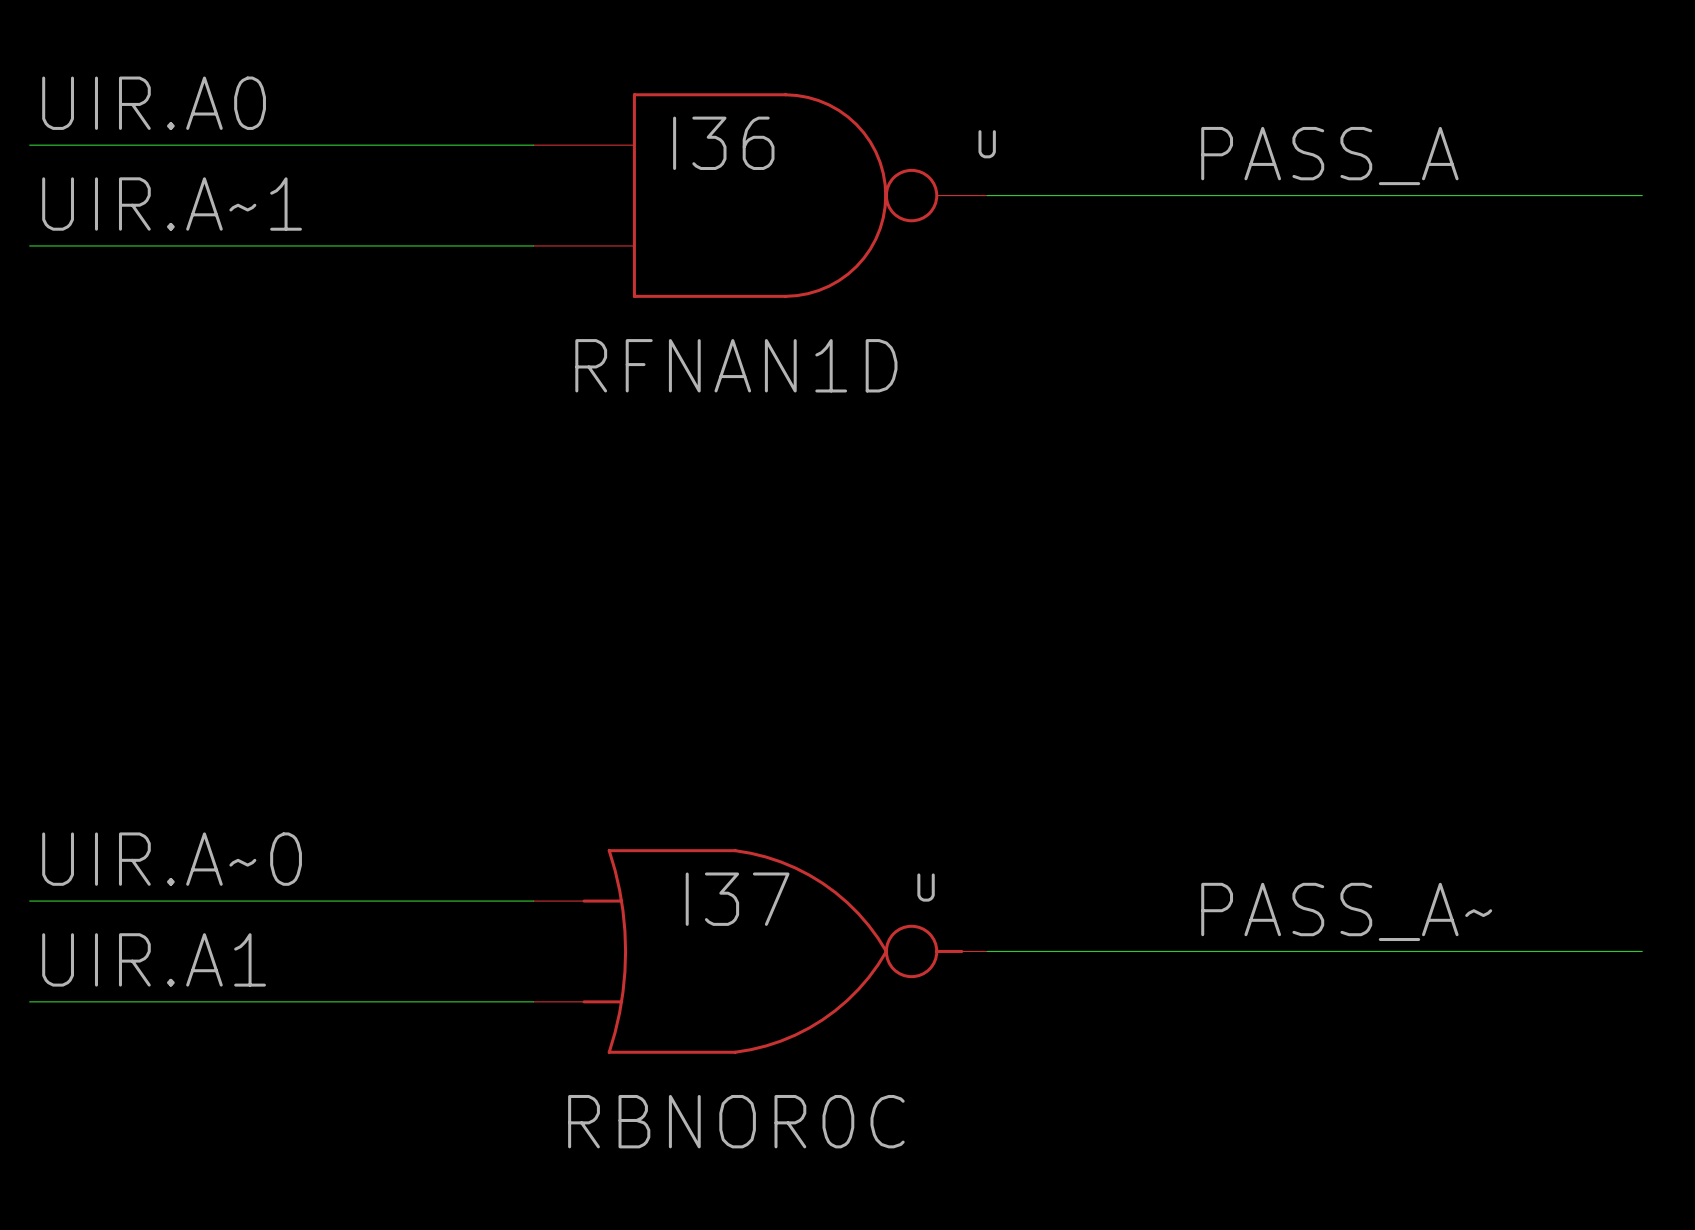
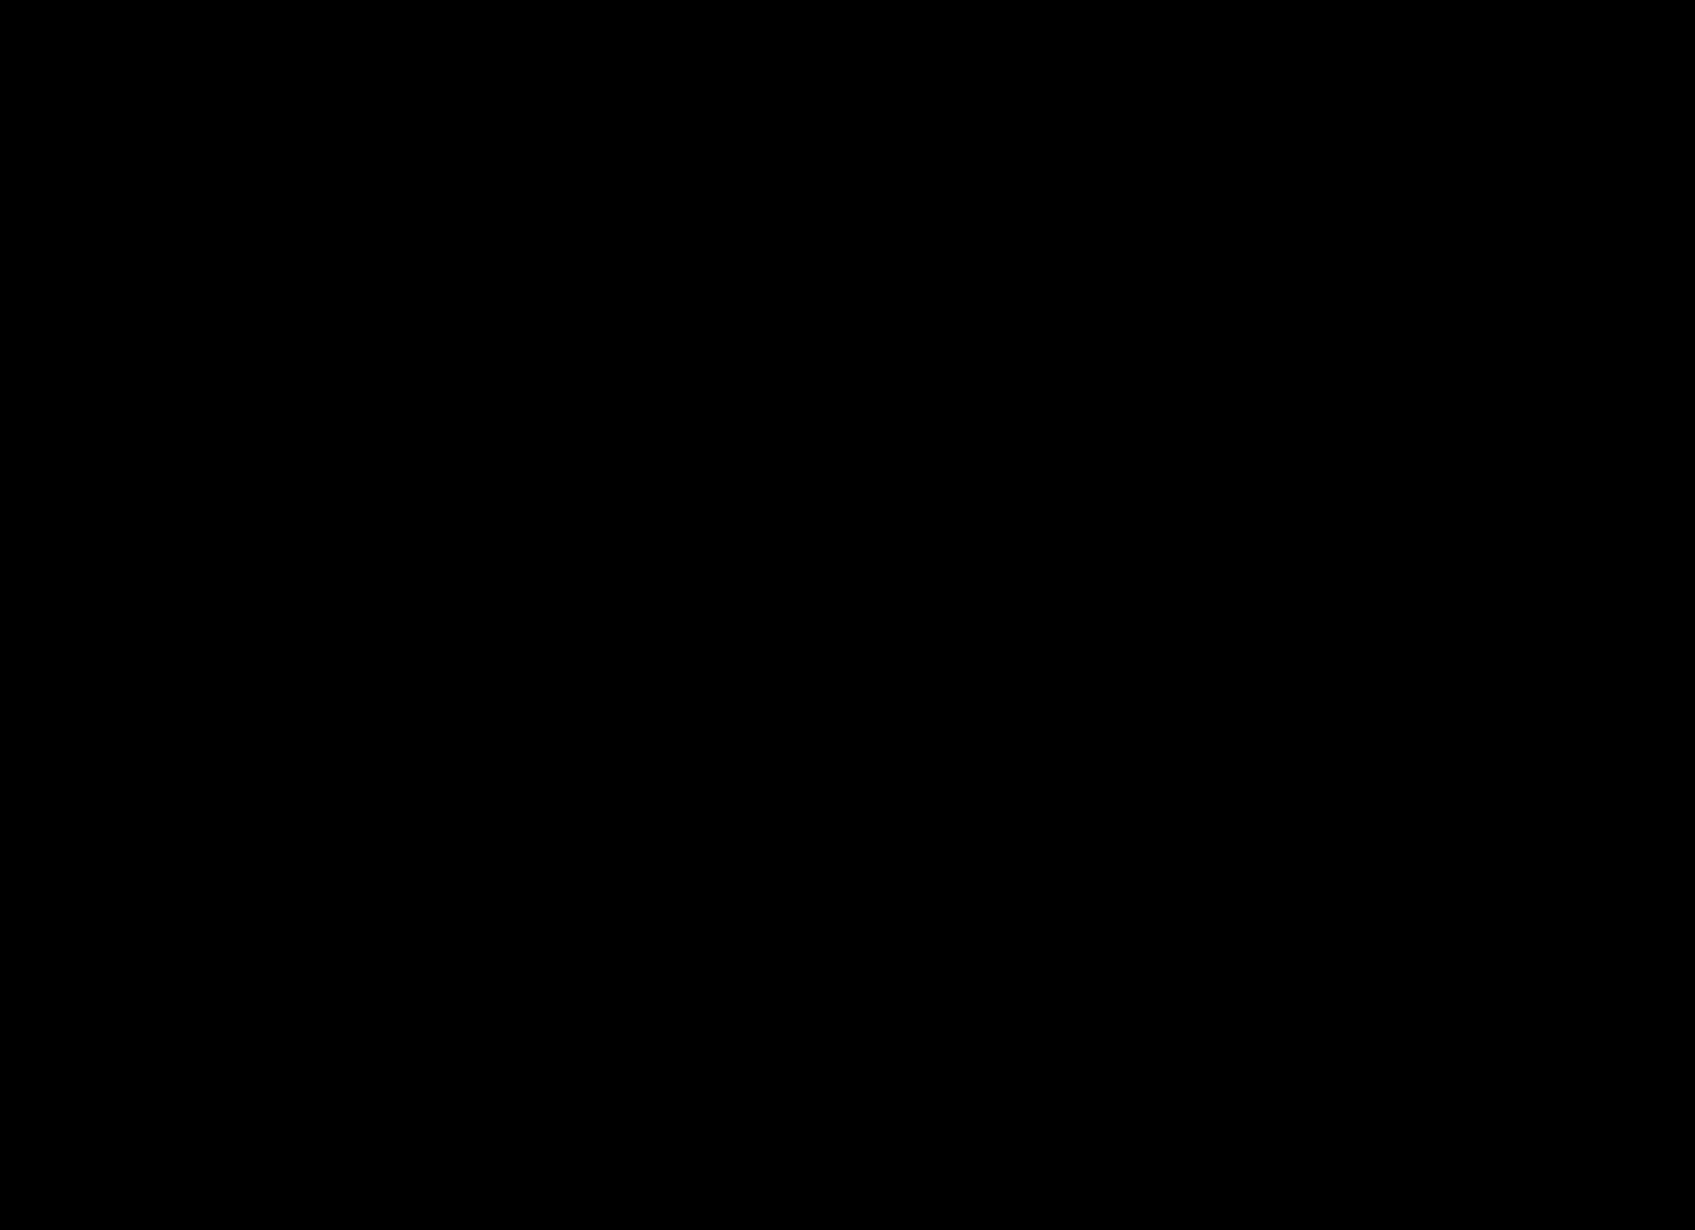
label: UIR.A0 (154, 103) -> none
wire: (29, 145) (533, 145) -> none
label: PASS_A (1329, 156) -> none
U: (760, 195) -> none
wire: (987, 195) (1642, 195) -> none
label: UIR.A~1 (172, 204) -> none
wire: (29, 245) (533, 245) -> none
label: UIR.A~0 (172, 859) -> none
wire: (29, 901) (533, 901) -> none
label: PASS_A~ (1346, 911) -> none
U: (760, 951) -> none
wire: (987, 951) (1642, 951) -> none
label: UIR.A1 (154, 959) -> none
wire: (29, 1001) (533, 1001) -> none

